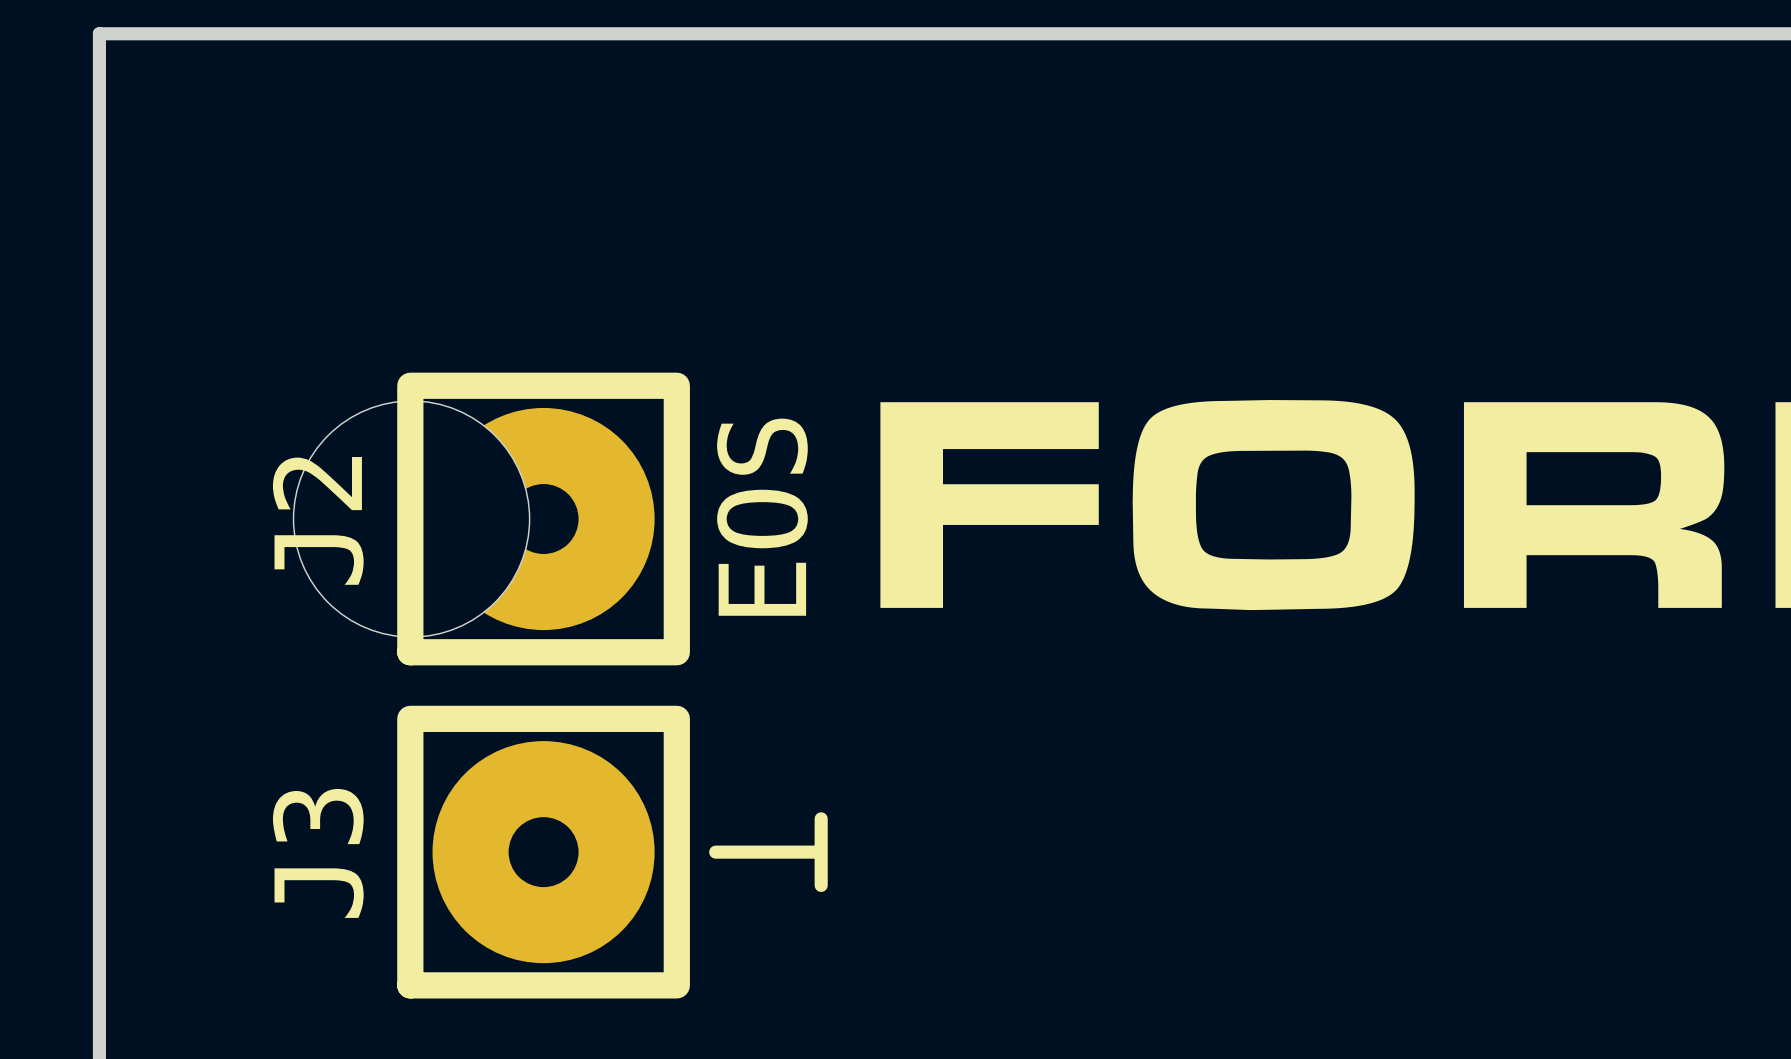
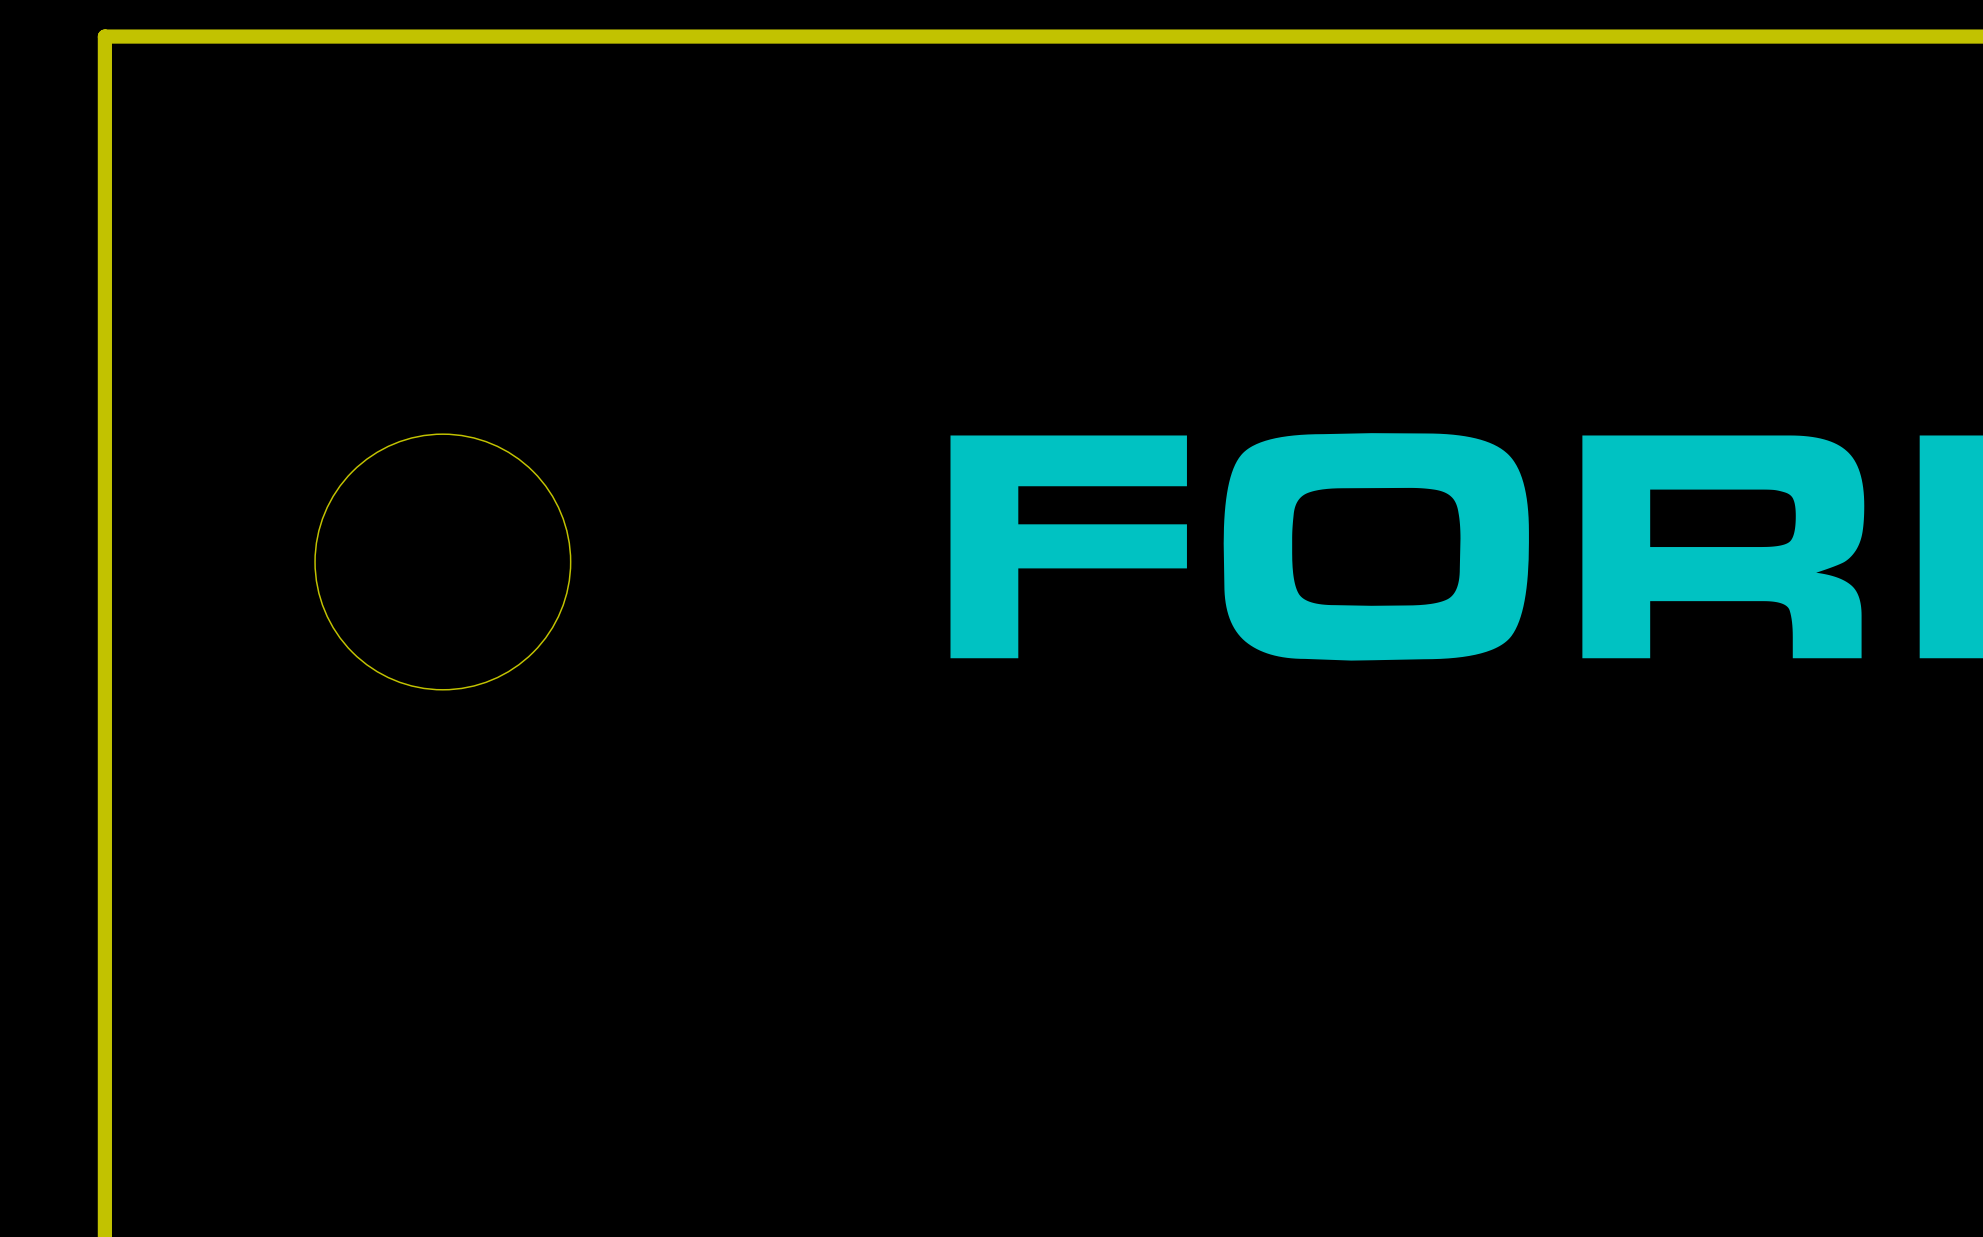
J2: EOS (543, 519) -> none
J3: (612, 852) -> none

